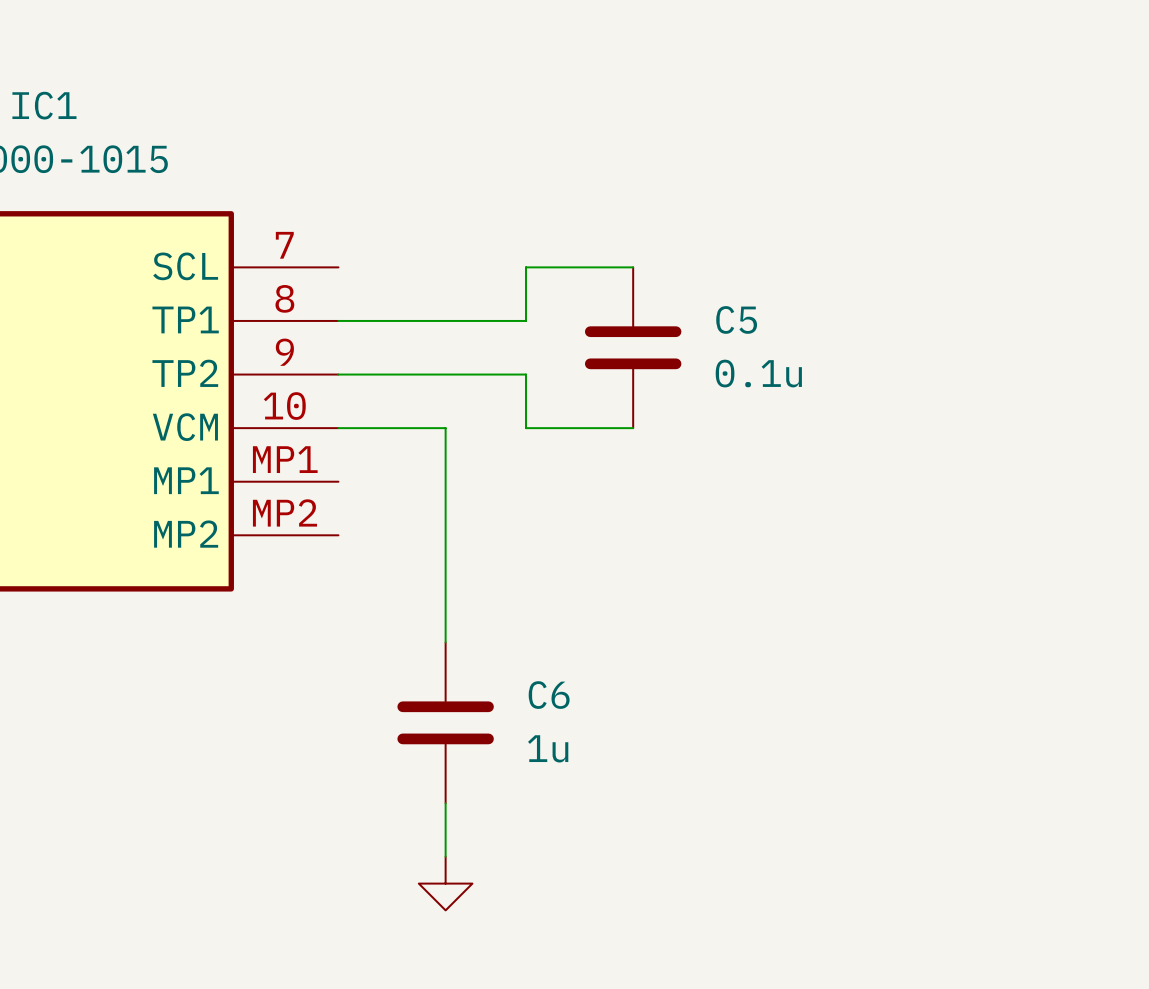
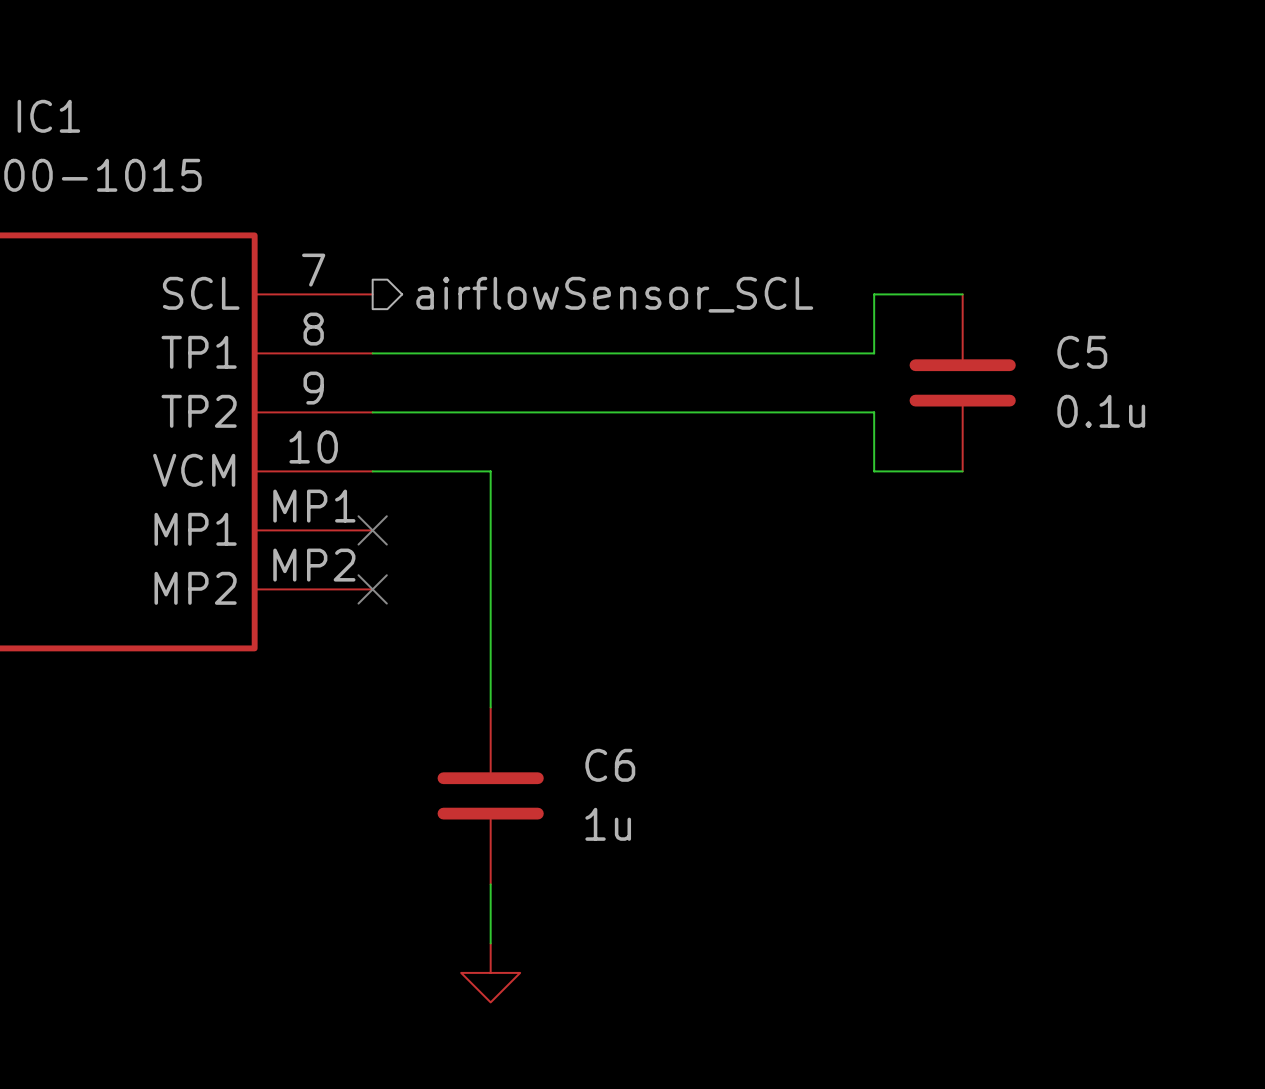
wire: (633, 267) (526, 267) (526, 320) -> (962, 294) (874, 294) (874, 353) (579, 353)
hierarchical label: none -> airflowSensor_SCL (614, 294)
C5 position: (633, 347) -> (962, 382)
wire: (526, 374) (526, 428) (633, 428) -> (579, 412) (874, 412) (874, 471) (962, 471)
no-connect mark: none -> (372, 530)
no-connect mark: none -> (372, 589)

